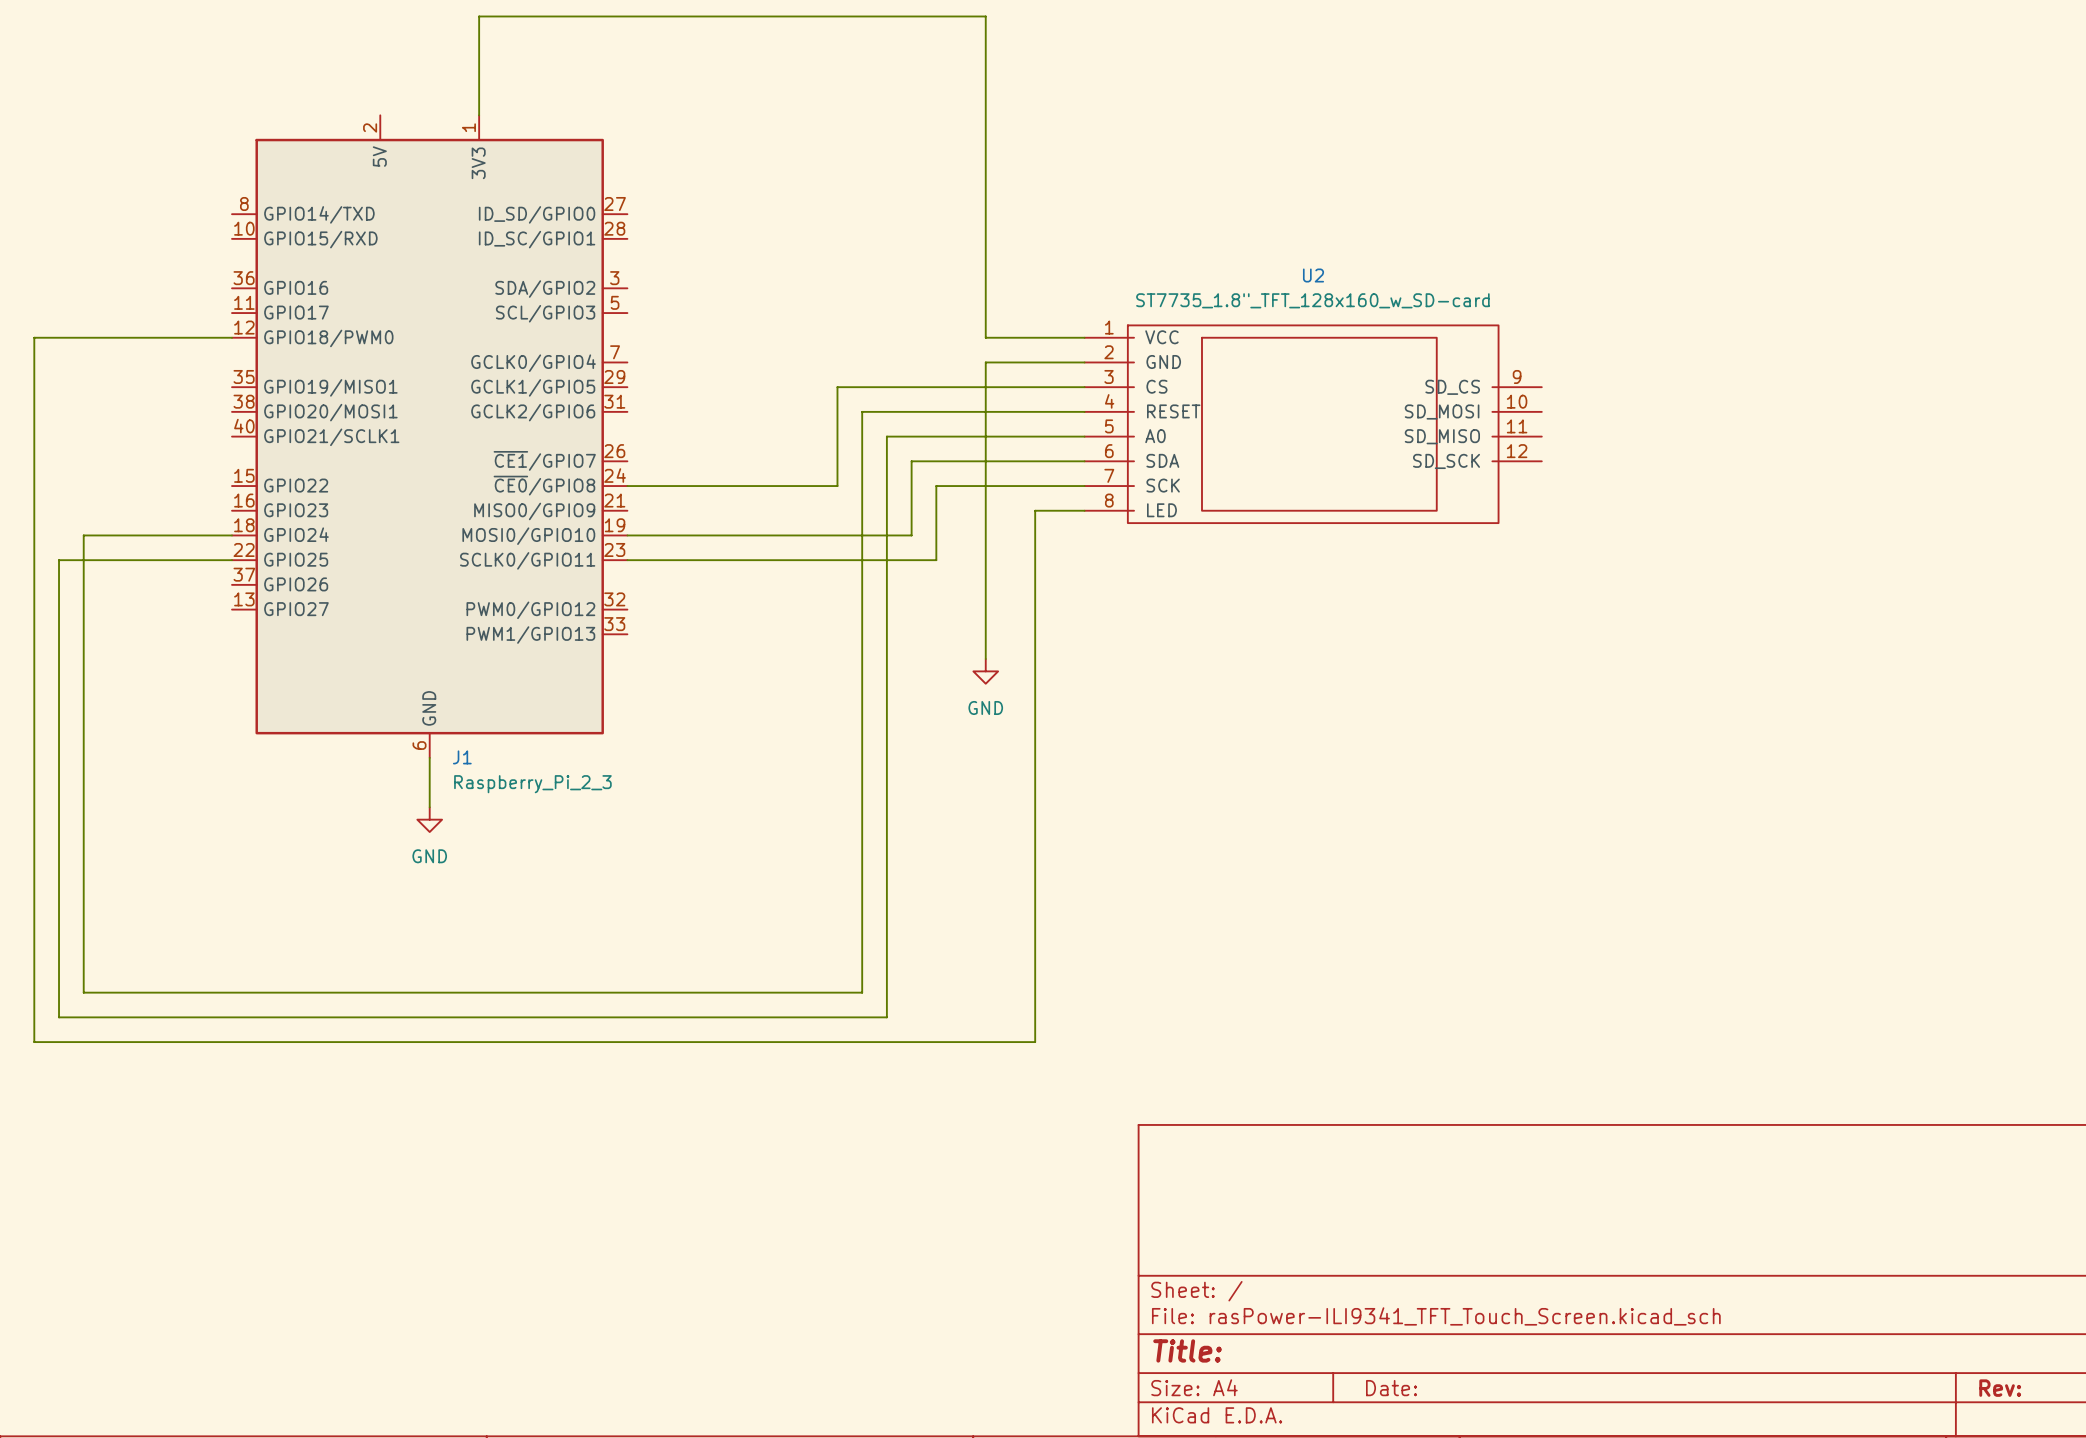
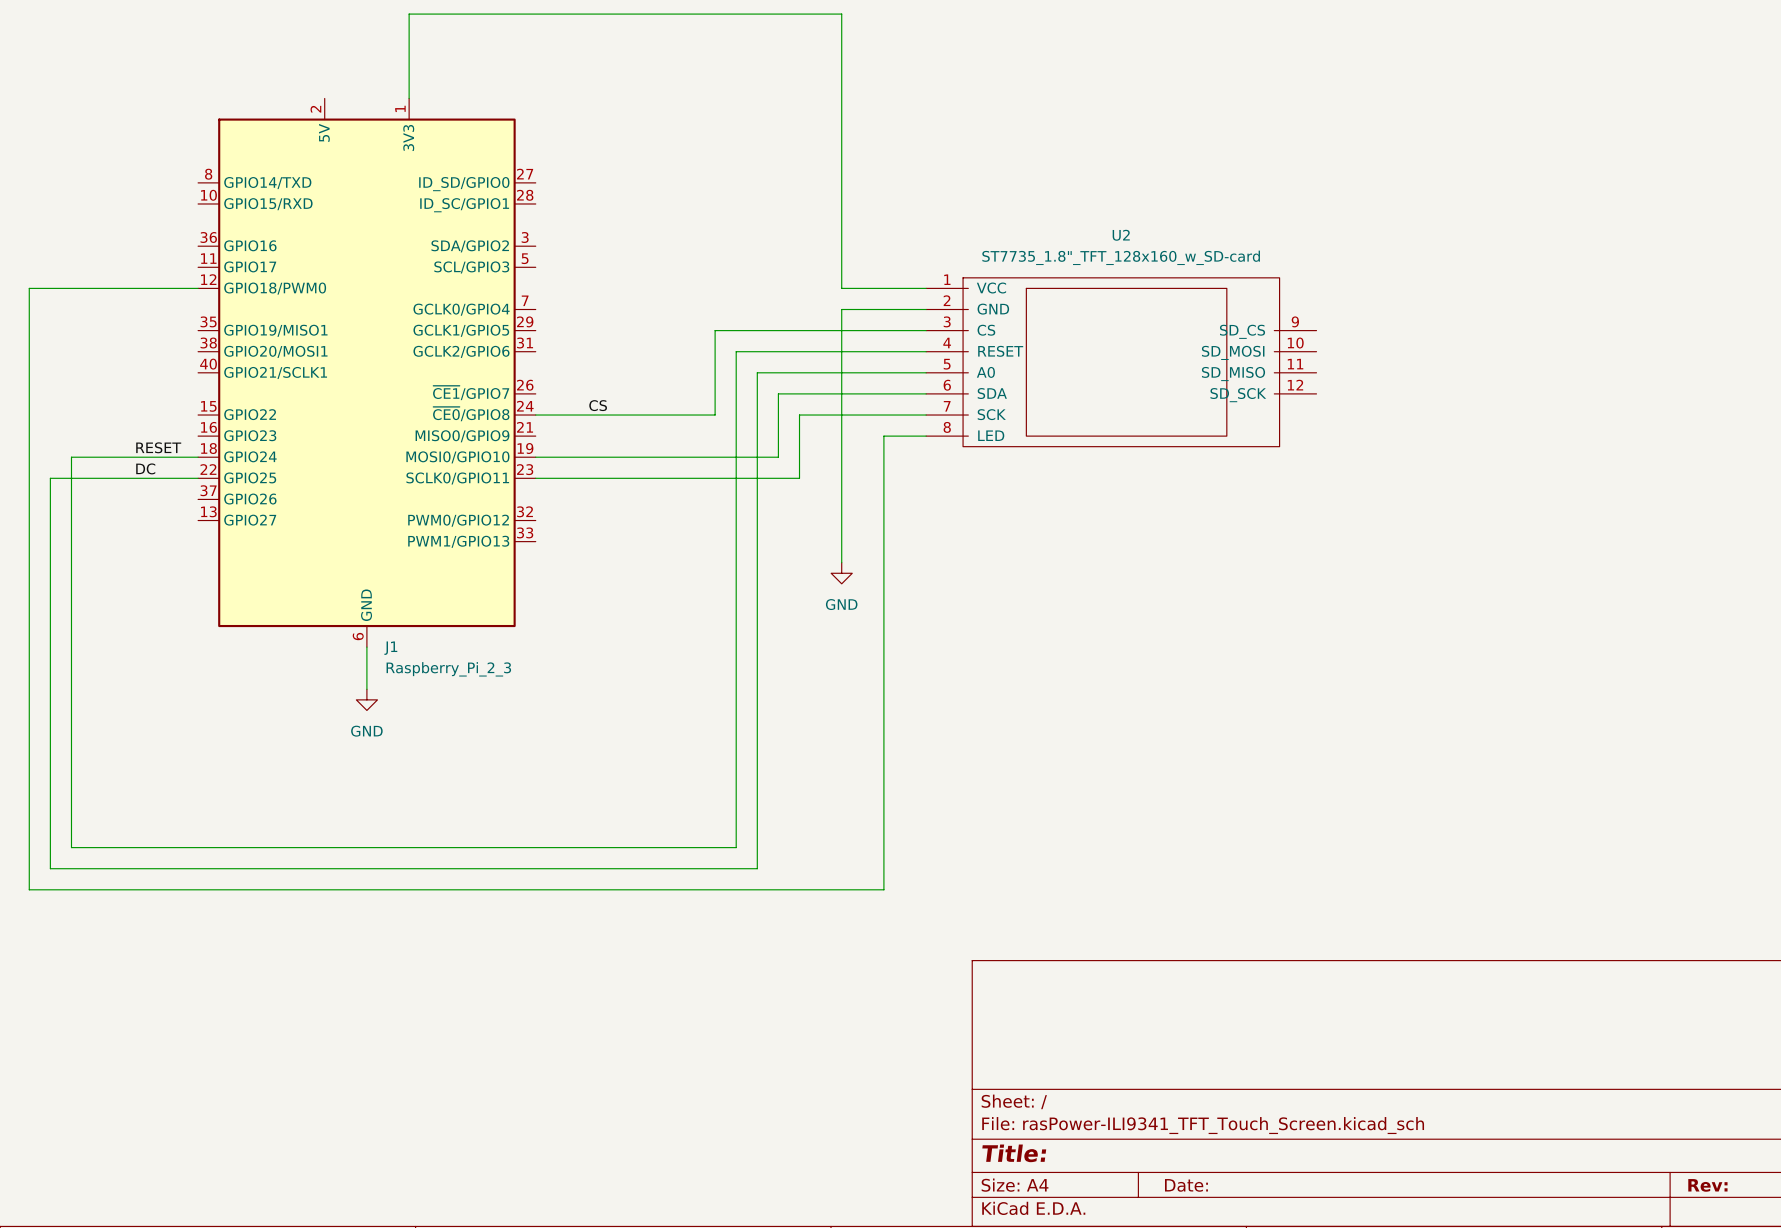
label: none -> CS (598, 405)
label: none -> RESET (158, 447)
label: none -> DC (145, 468)

